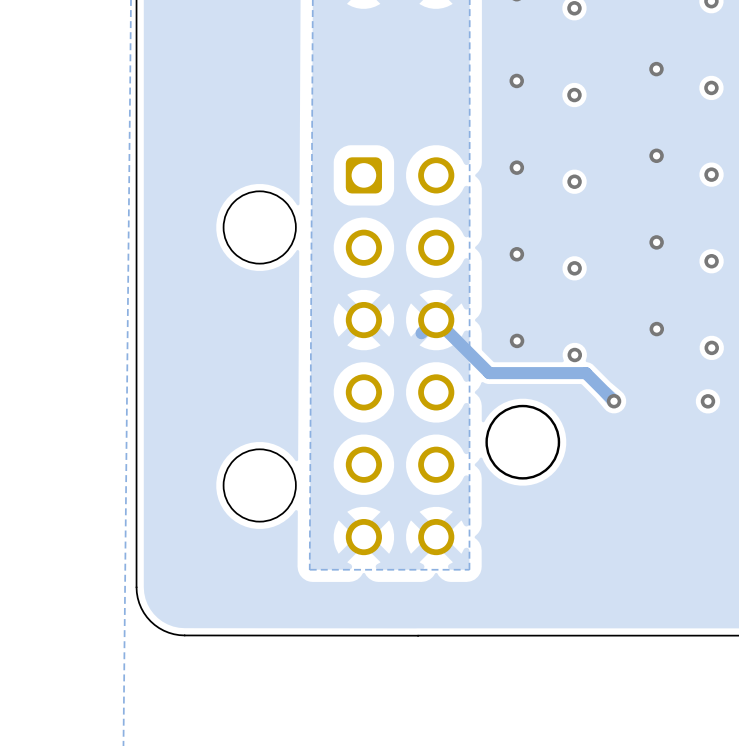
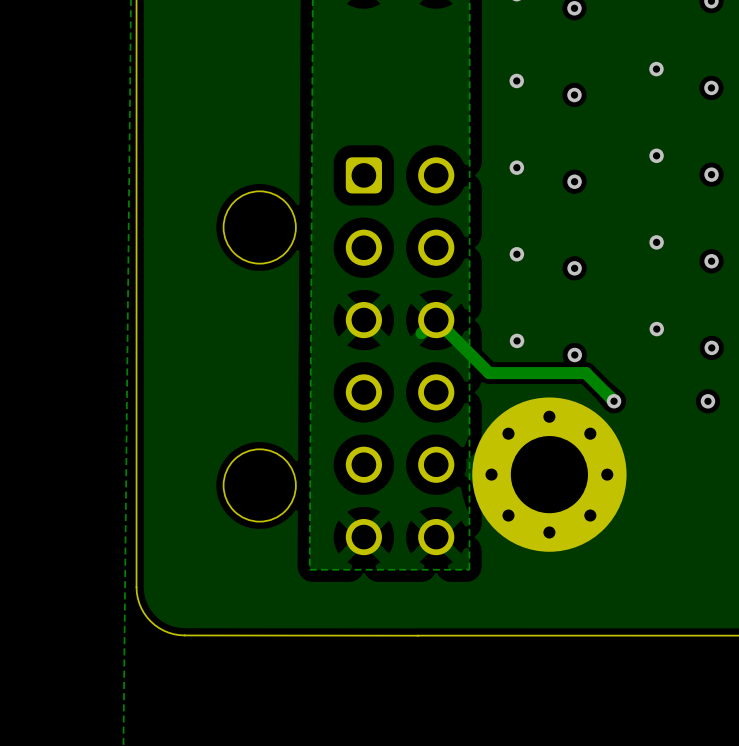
round board edge: [485, 404, 561, 480] -> none
part: none -> (549, 474)

